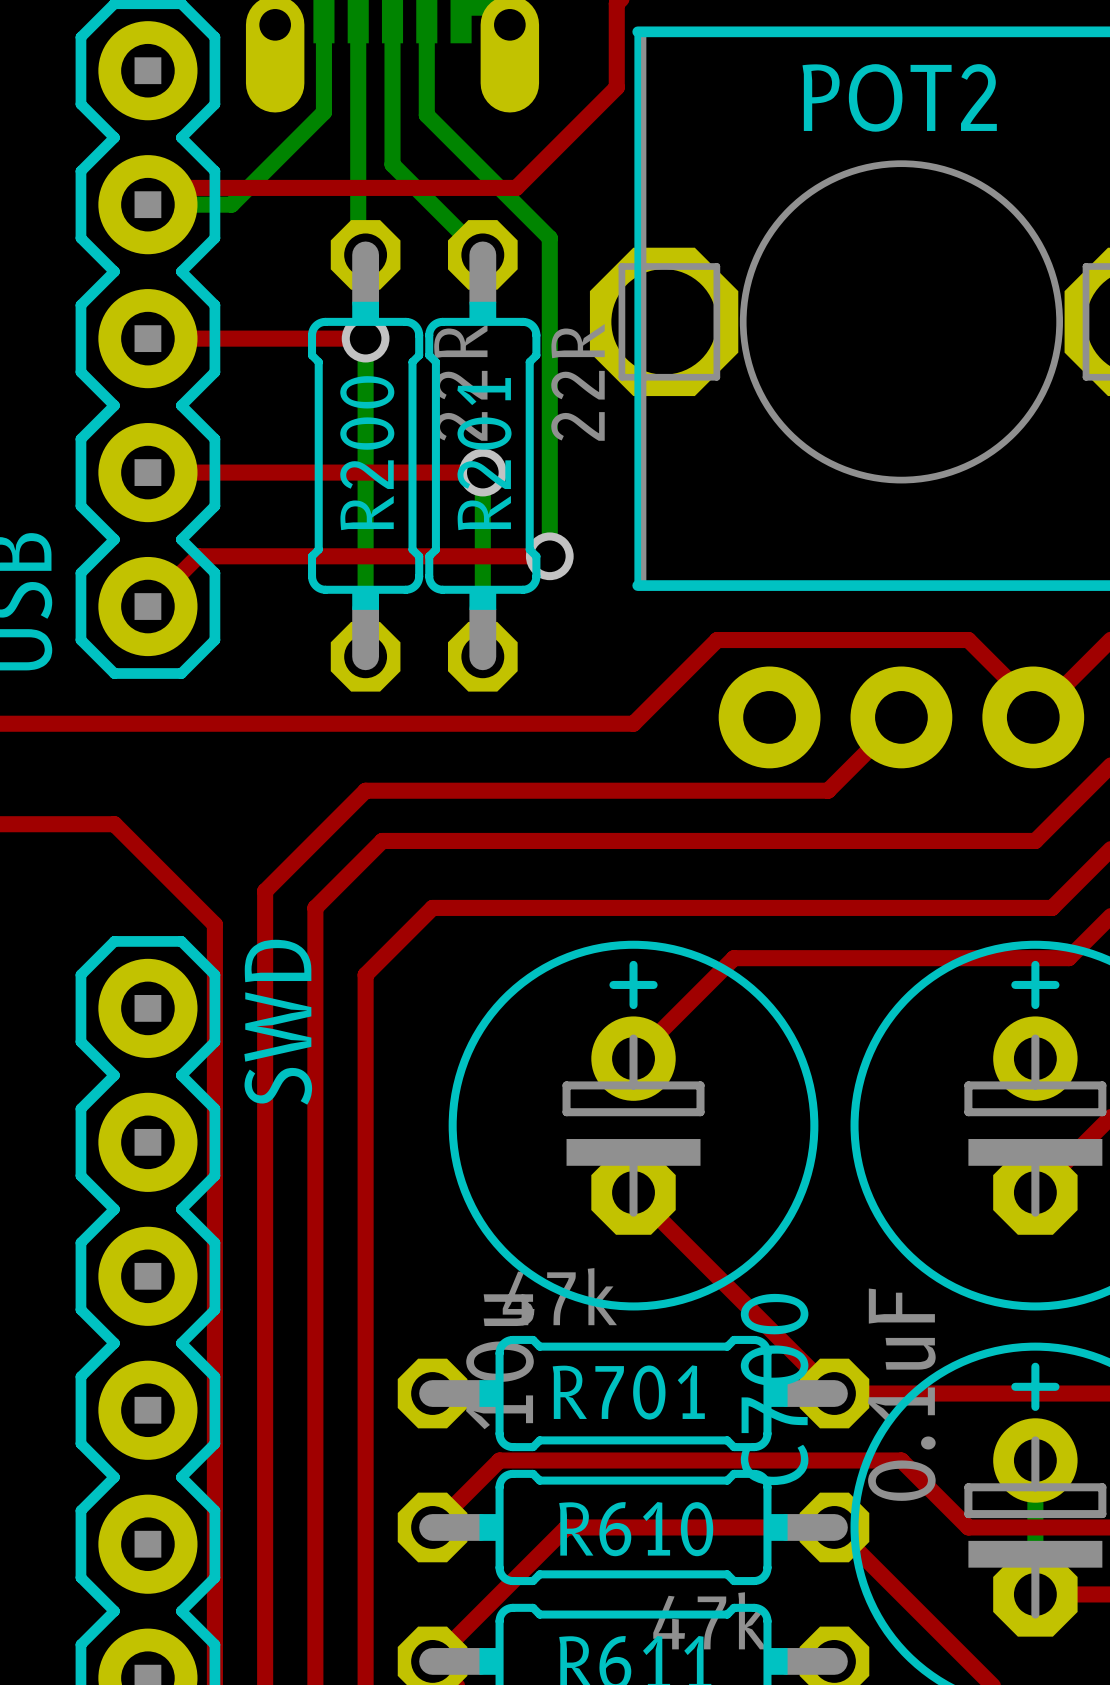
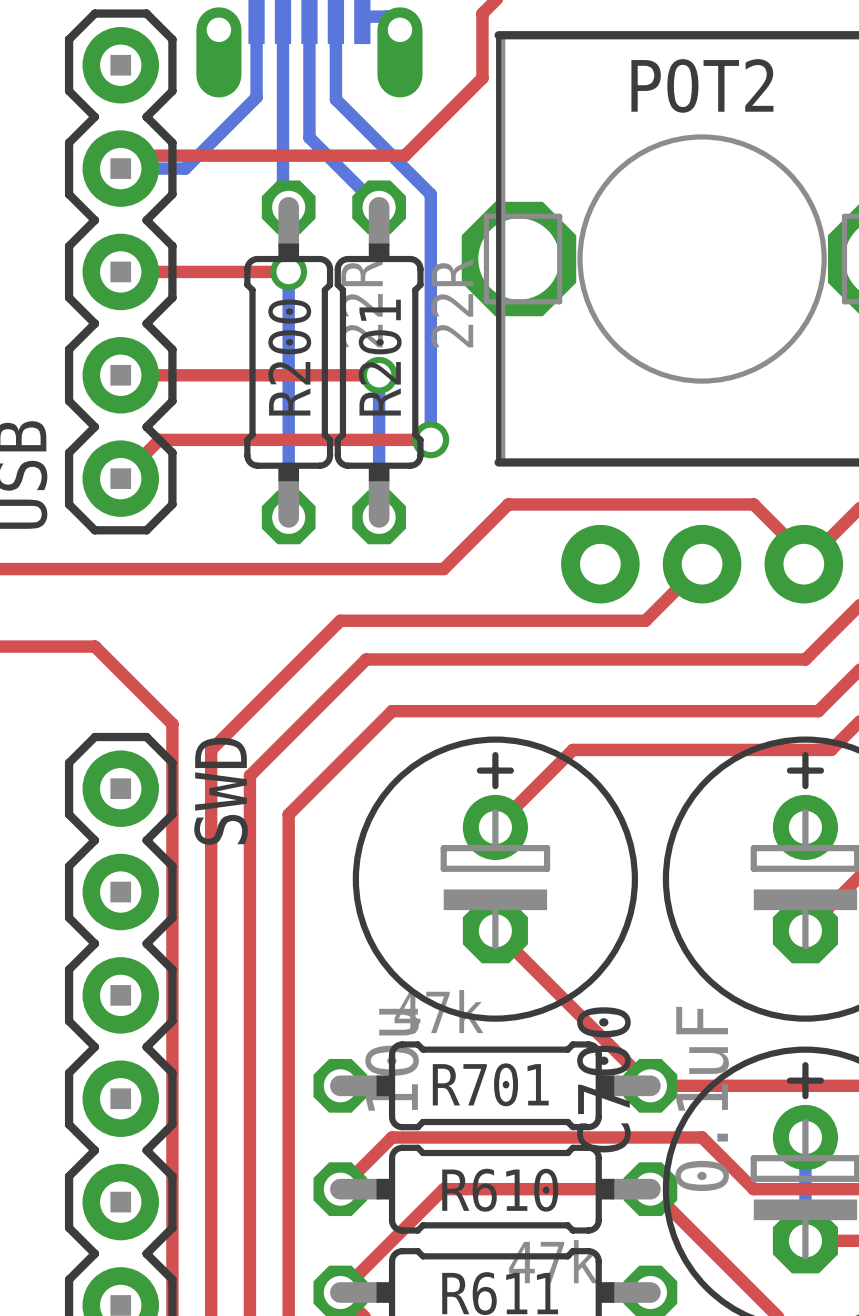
top track: (717, 640) (633, 723) (566, 723) -> (559, 504) (508, 504) (443, 569)
top track: (432, 790) (365, 790) (265, 891) (265, 958) -> none
top track: (382, 840) (466, 840) -> (301, 659) (340, 620)
top track: none -> (366, 659) (249, 775)
top track: (315, 907) (315, 991) -> (249, 711) (211, 749)
top track: (499, 907) (432, 907) (365, 974) (365, 1041) -> (392, 711) (288, 814)

